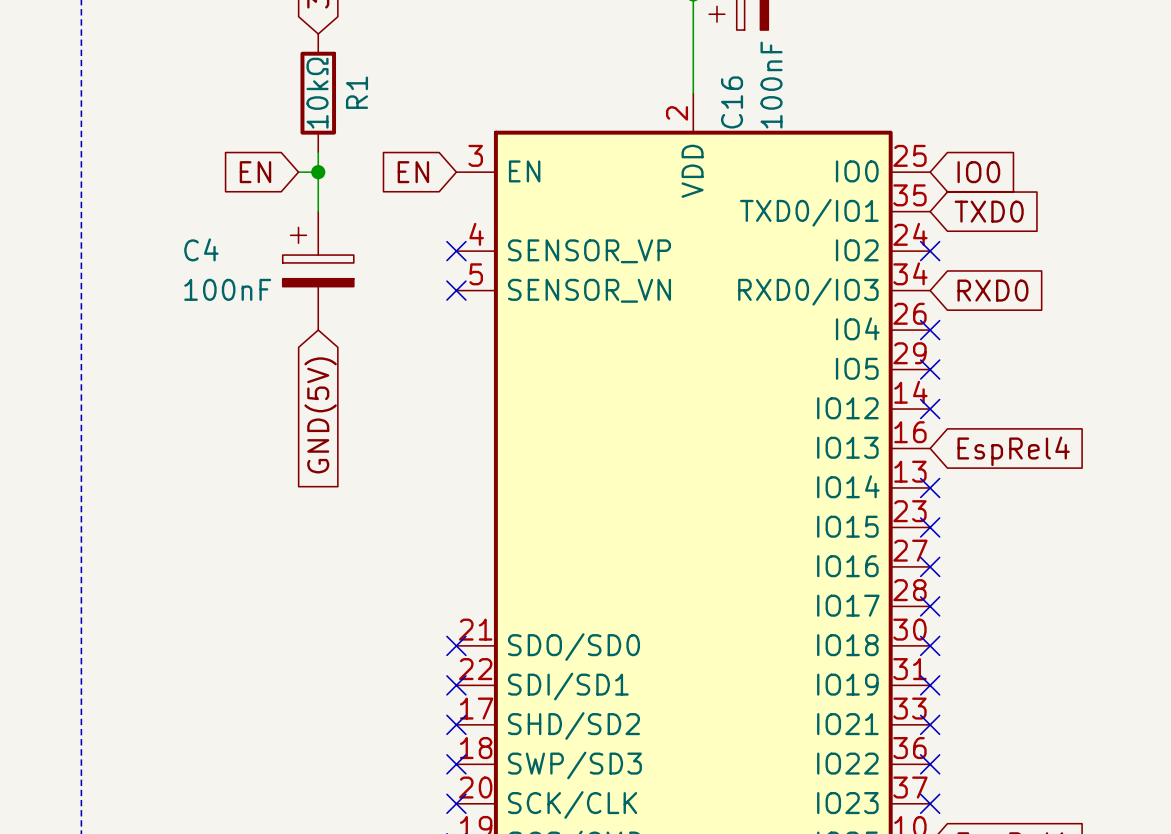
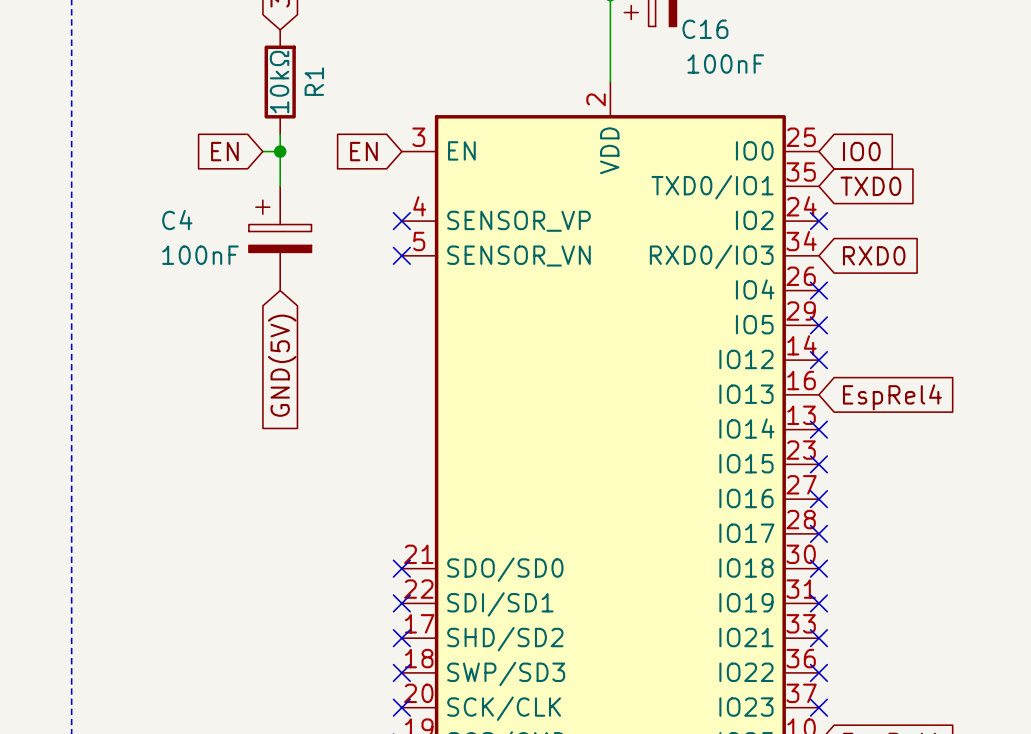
C16 value rotation: 0° (771, 85) -> 90° clockwise (725, 64)
C16 name rotation: 0° (732, 102) -> 90° clockwise (705, 29)
C16 name position: C16 (732, 102) -> C16 (705, 29)

